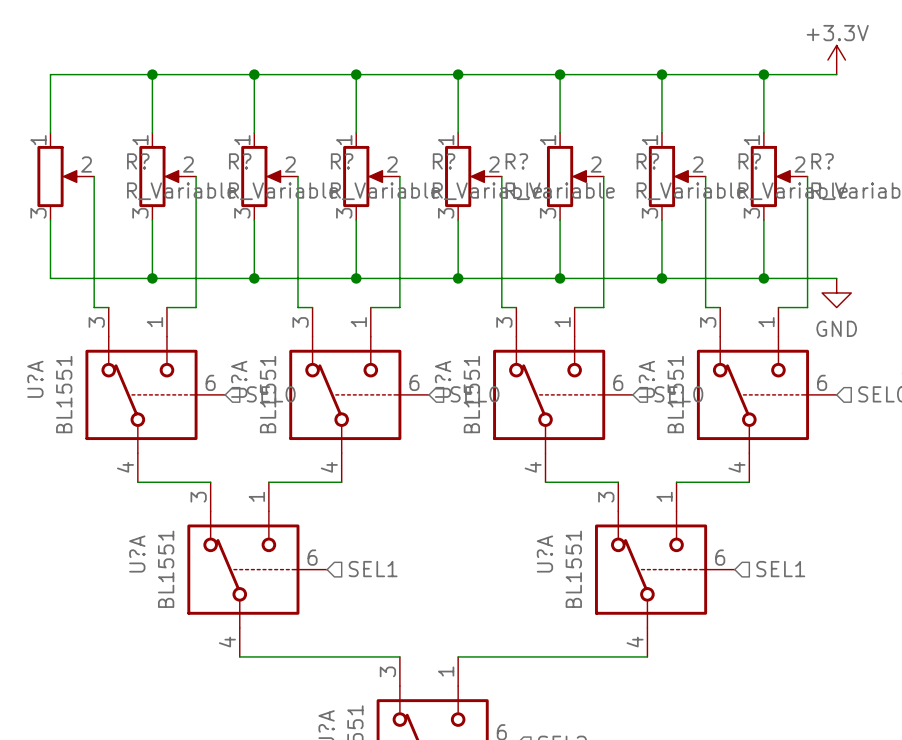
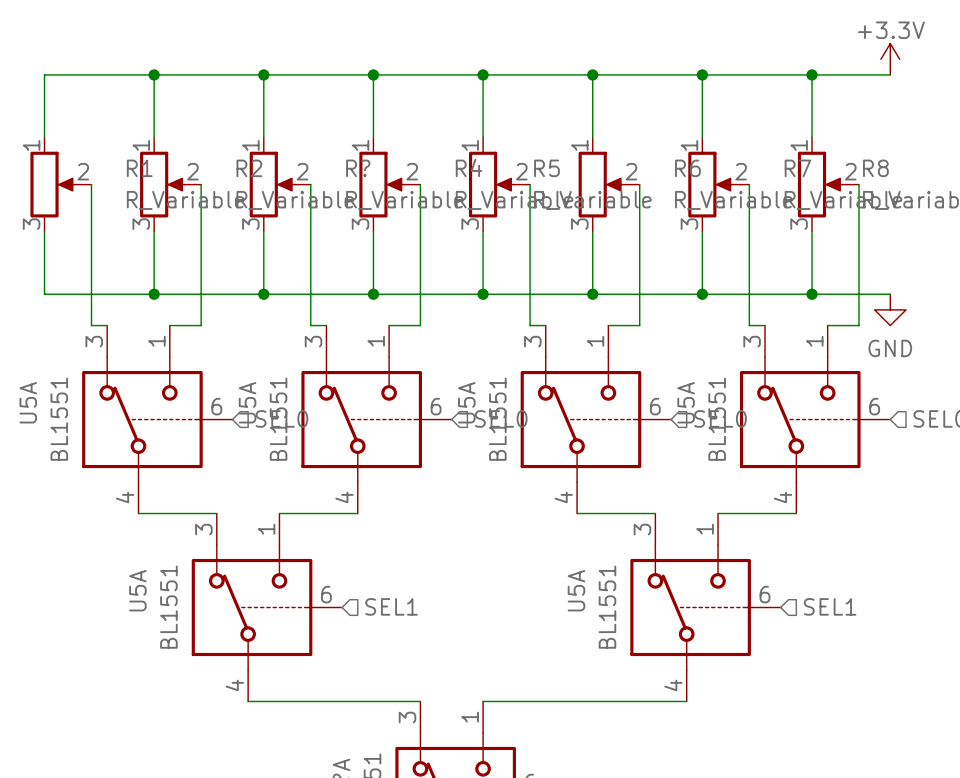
R? name: R? (138, 161) -> R1 (139, 168)
R? name: R? (240, 161) -> R2 (249, 168)
R? name: R? (444, 161) -> R4 (469, 167)
R? name: R? (516, 161) -> R5 (546, 168)
R? name: R? (647, 161) -> R6 (687, 168)
R? name: R? (749, 161) -> R7 (797, 168)
R? name: R? (822, 161) -> R8 (875, 168)
U?A name: U?A (35, 379) -> U5A (28, 402)
U?A name: U?A (239, 379) -> U5A (247, 402)
U?A name: U?A (443, 379) -> U5A (466, 402)
U?A name: U?A (646, 379) -> U5A (686, 402)
U?A name: U?A (137, 554) -> U5A (137, 590)
U?A name: U?A (544, 554) -> U5A (576, 590)

